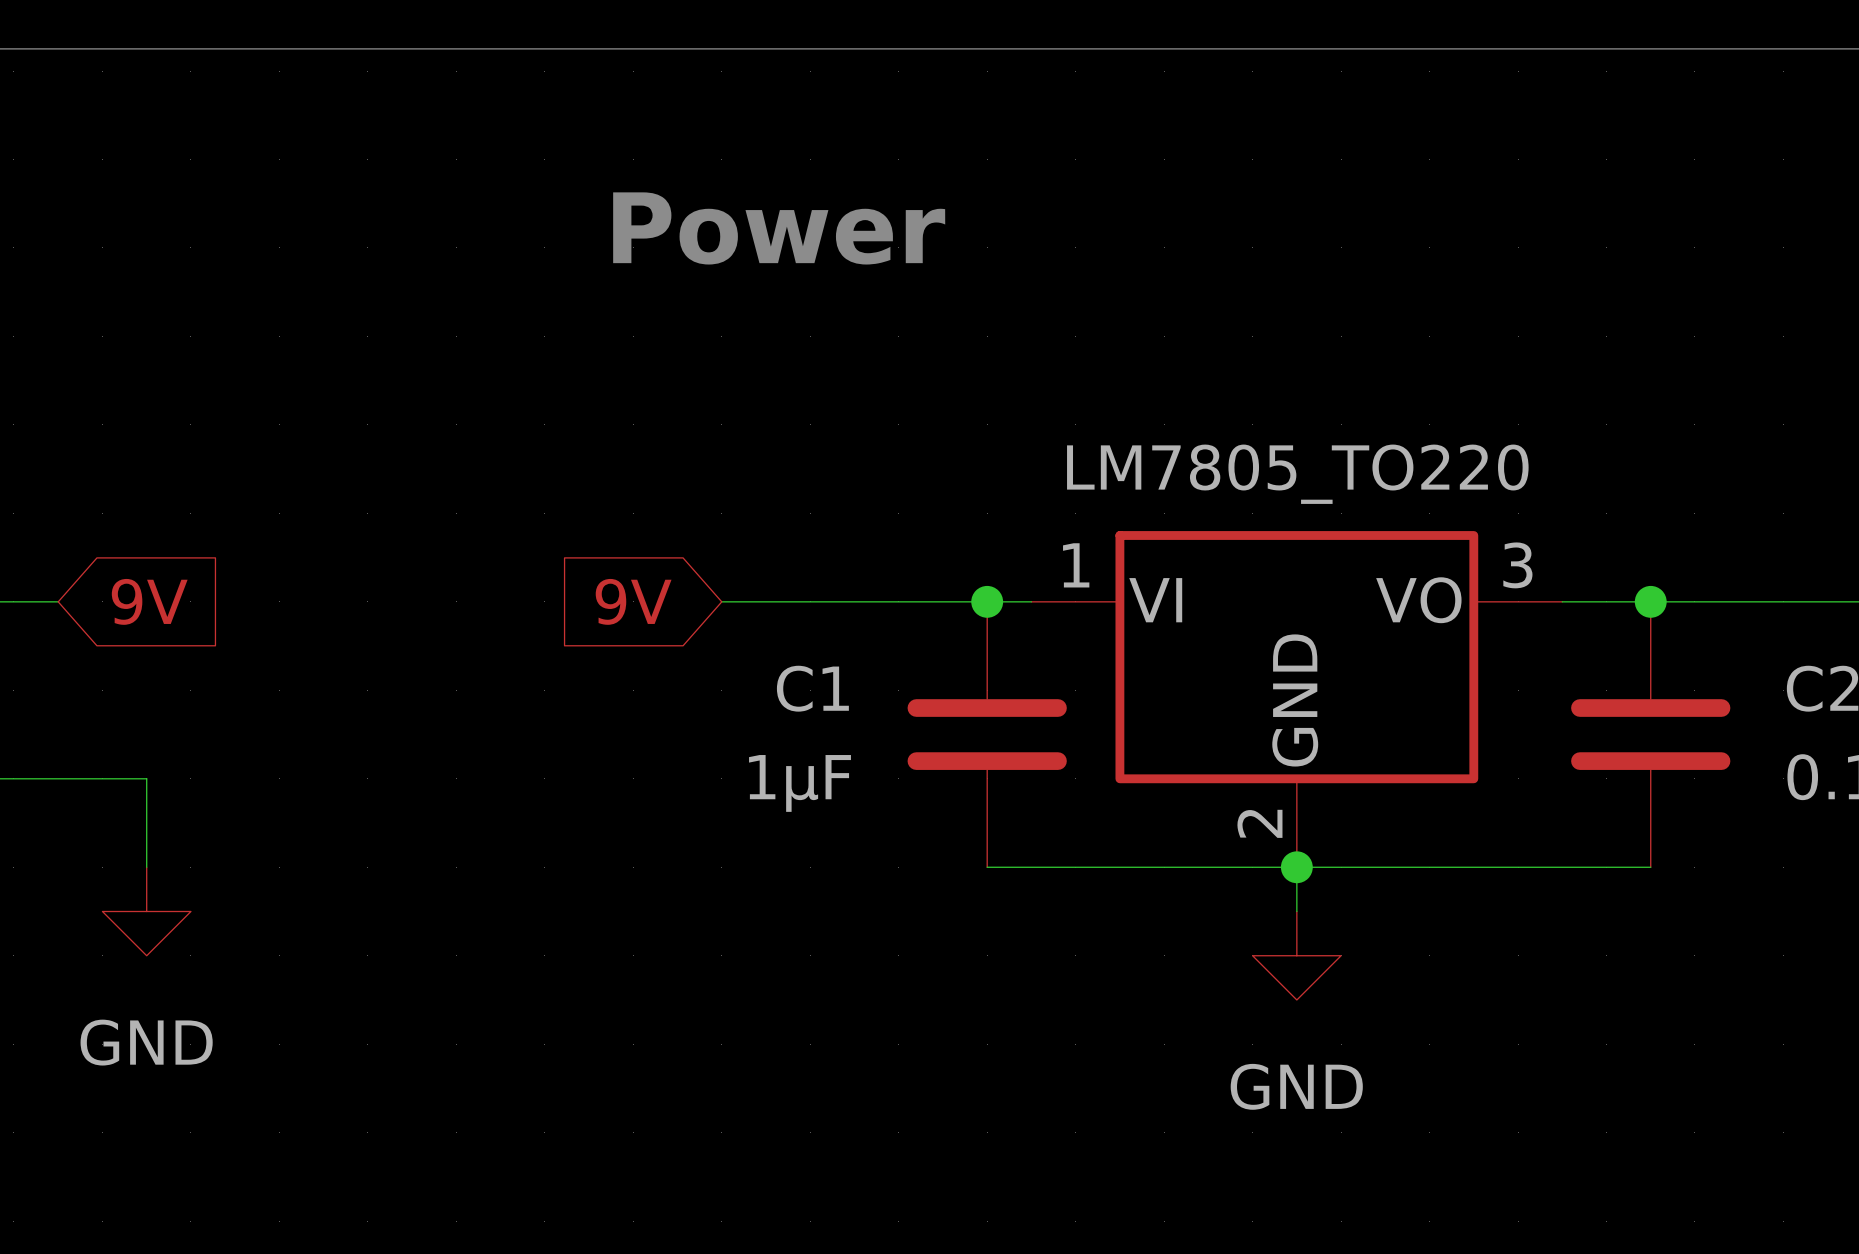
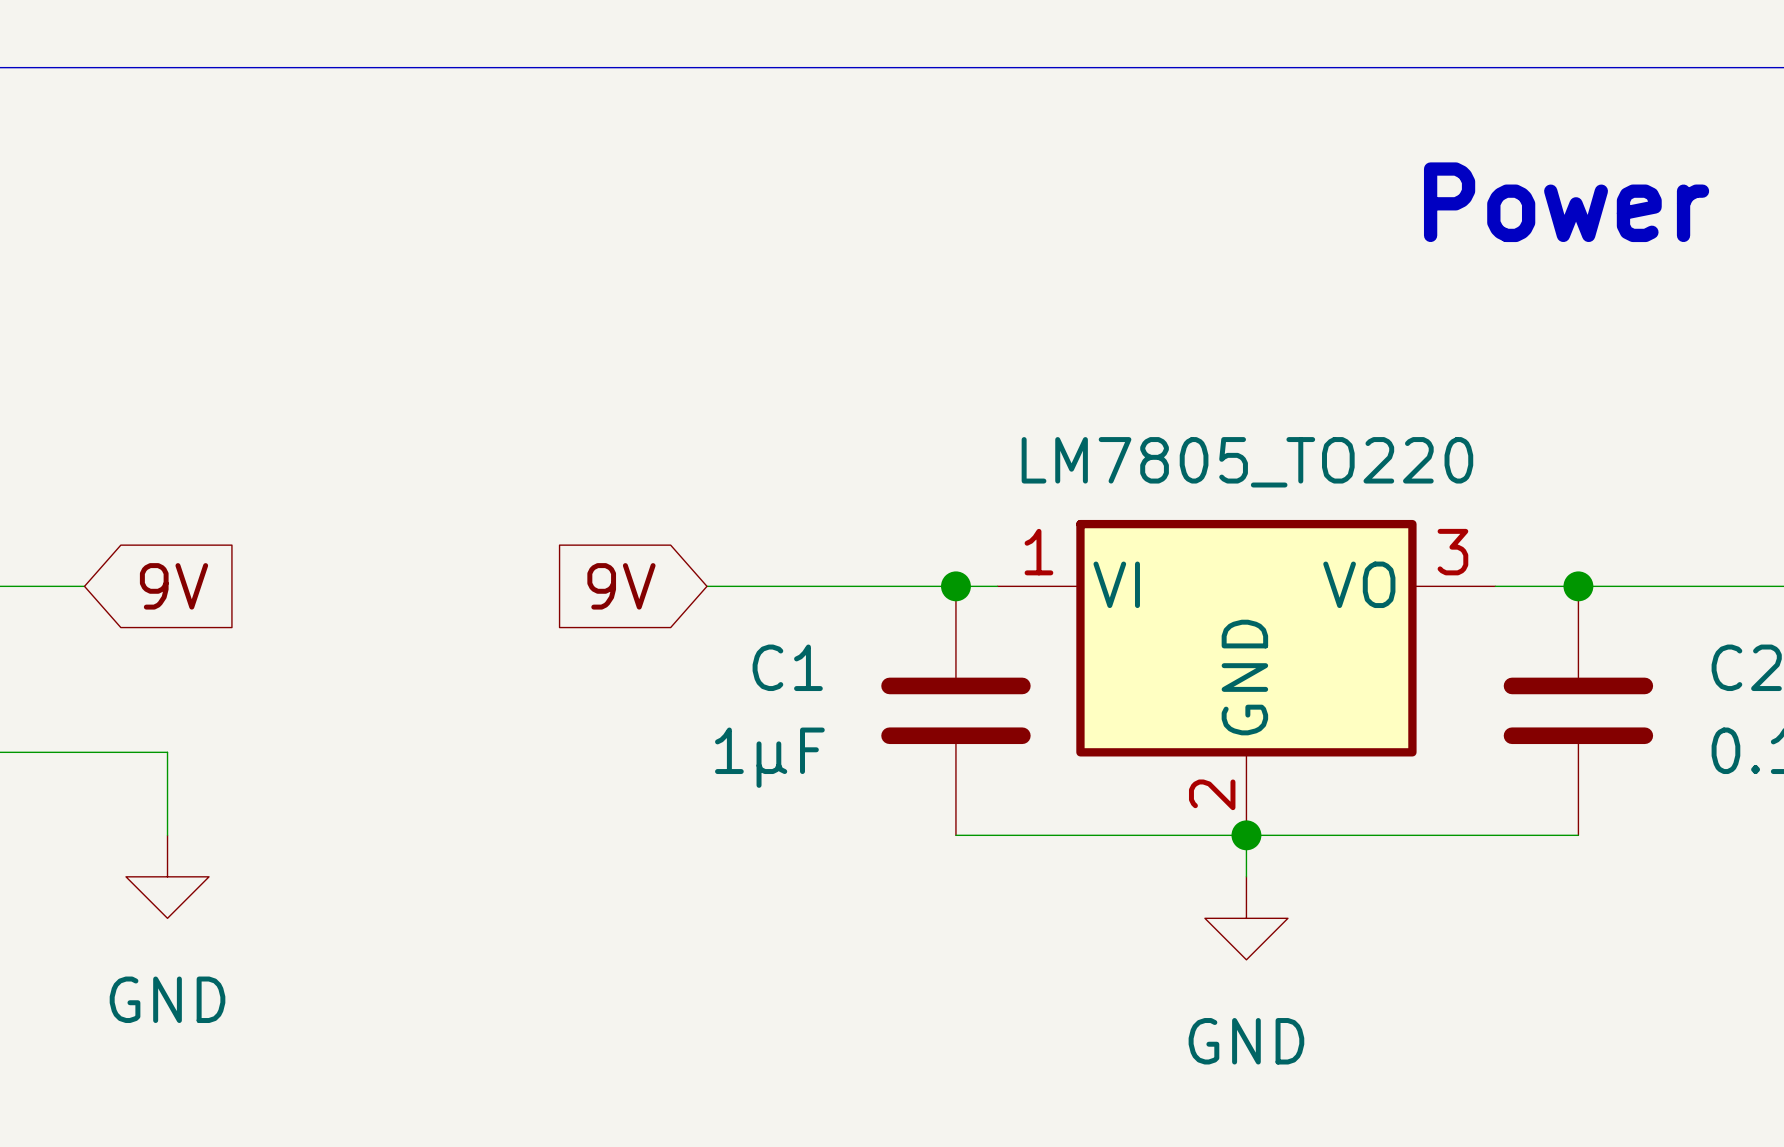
text position: Power (779, 228) -> Power (1566, 202)

